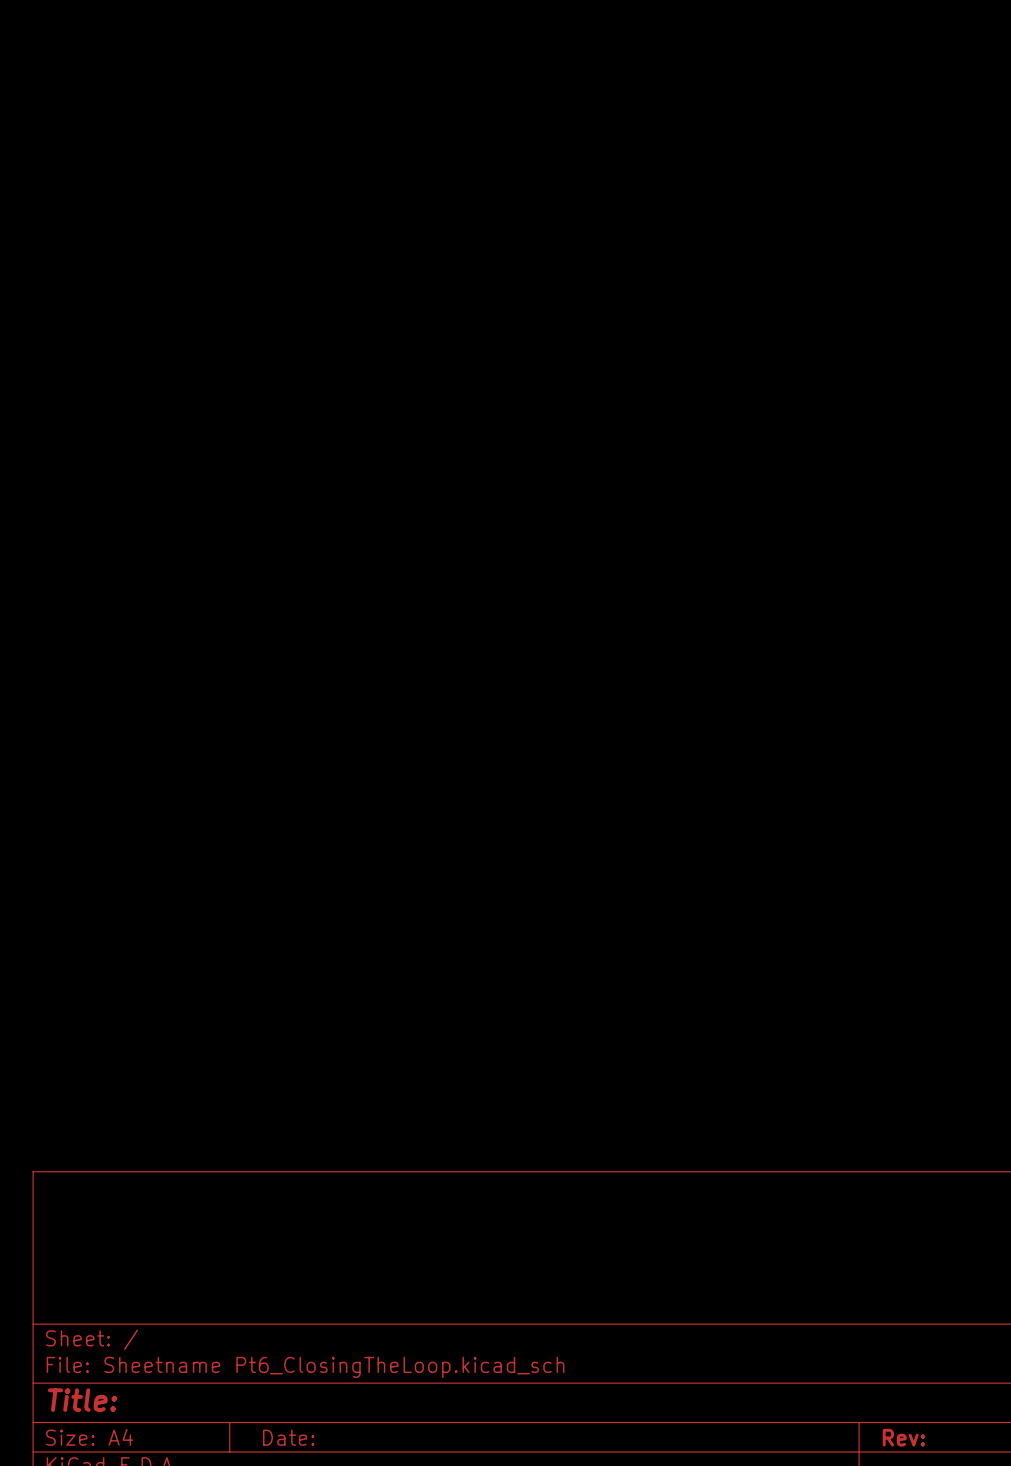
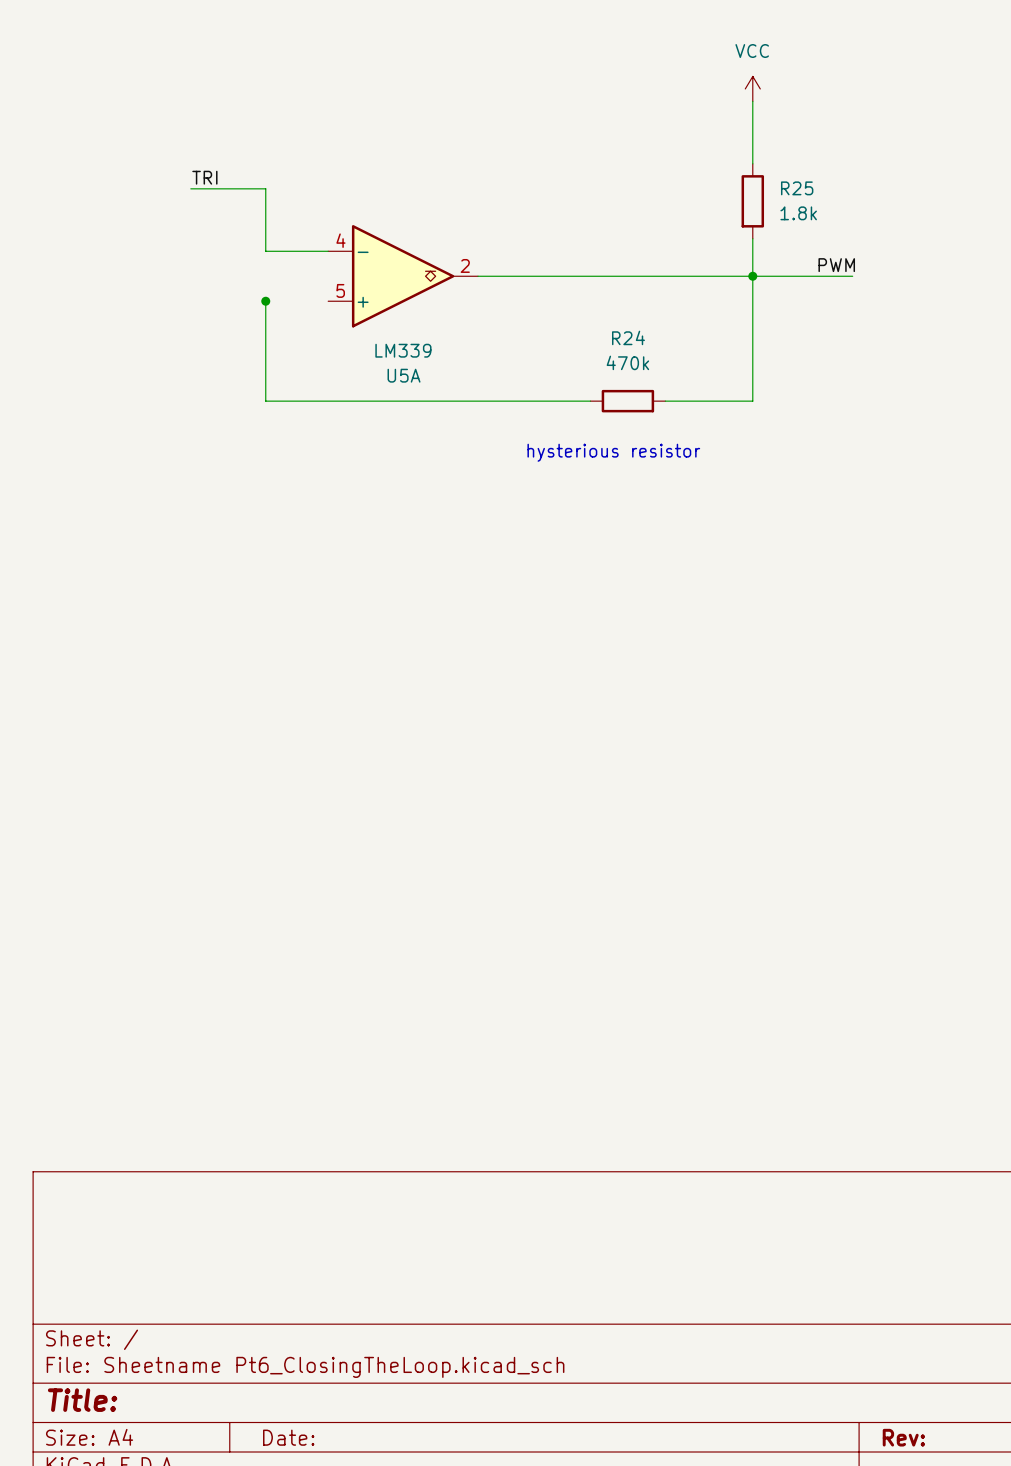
power symbol: none -> VCC (752, 88)
wire: none -> (752, 101) (752, 163)
label: none -> TRI (204, 177)
wire: none -> (190, 188) (265, 188) (265, 251) (328, 251)
R25: none -> 1.8k (752, 201)
wire: none -> (752, 238) (752, 401) (665, 401)
label: none -> PWM (836, 265)
U5A: none -> LM339 (403, 276)
wire: none -> (478, 276) (852, 276)
junction: none -> (752, 276)
wire: none -> (265, 301) (265, 401) (590, 401)
junction: none -> (265, 301)
R24: none -> 470k (627, 401)
text: none -> hysterious resistor (613, 452)

